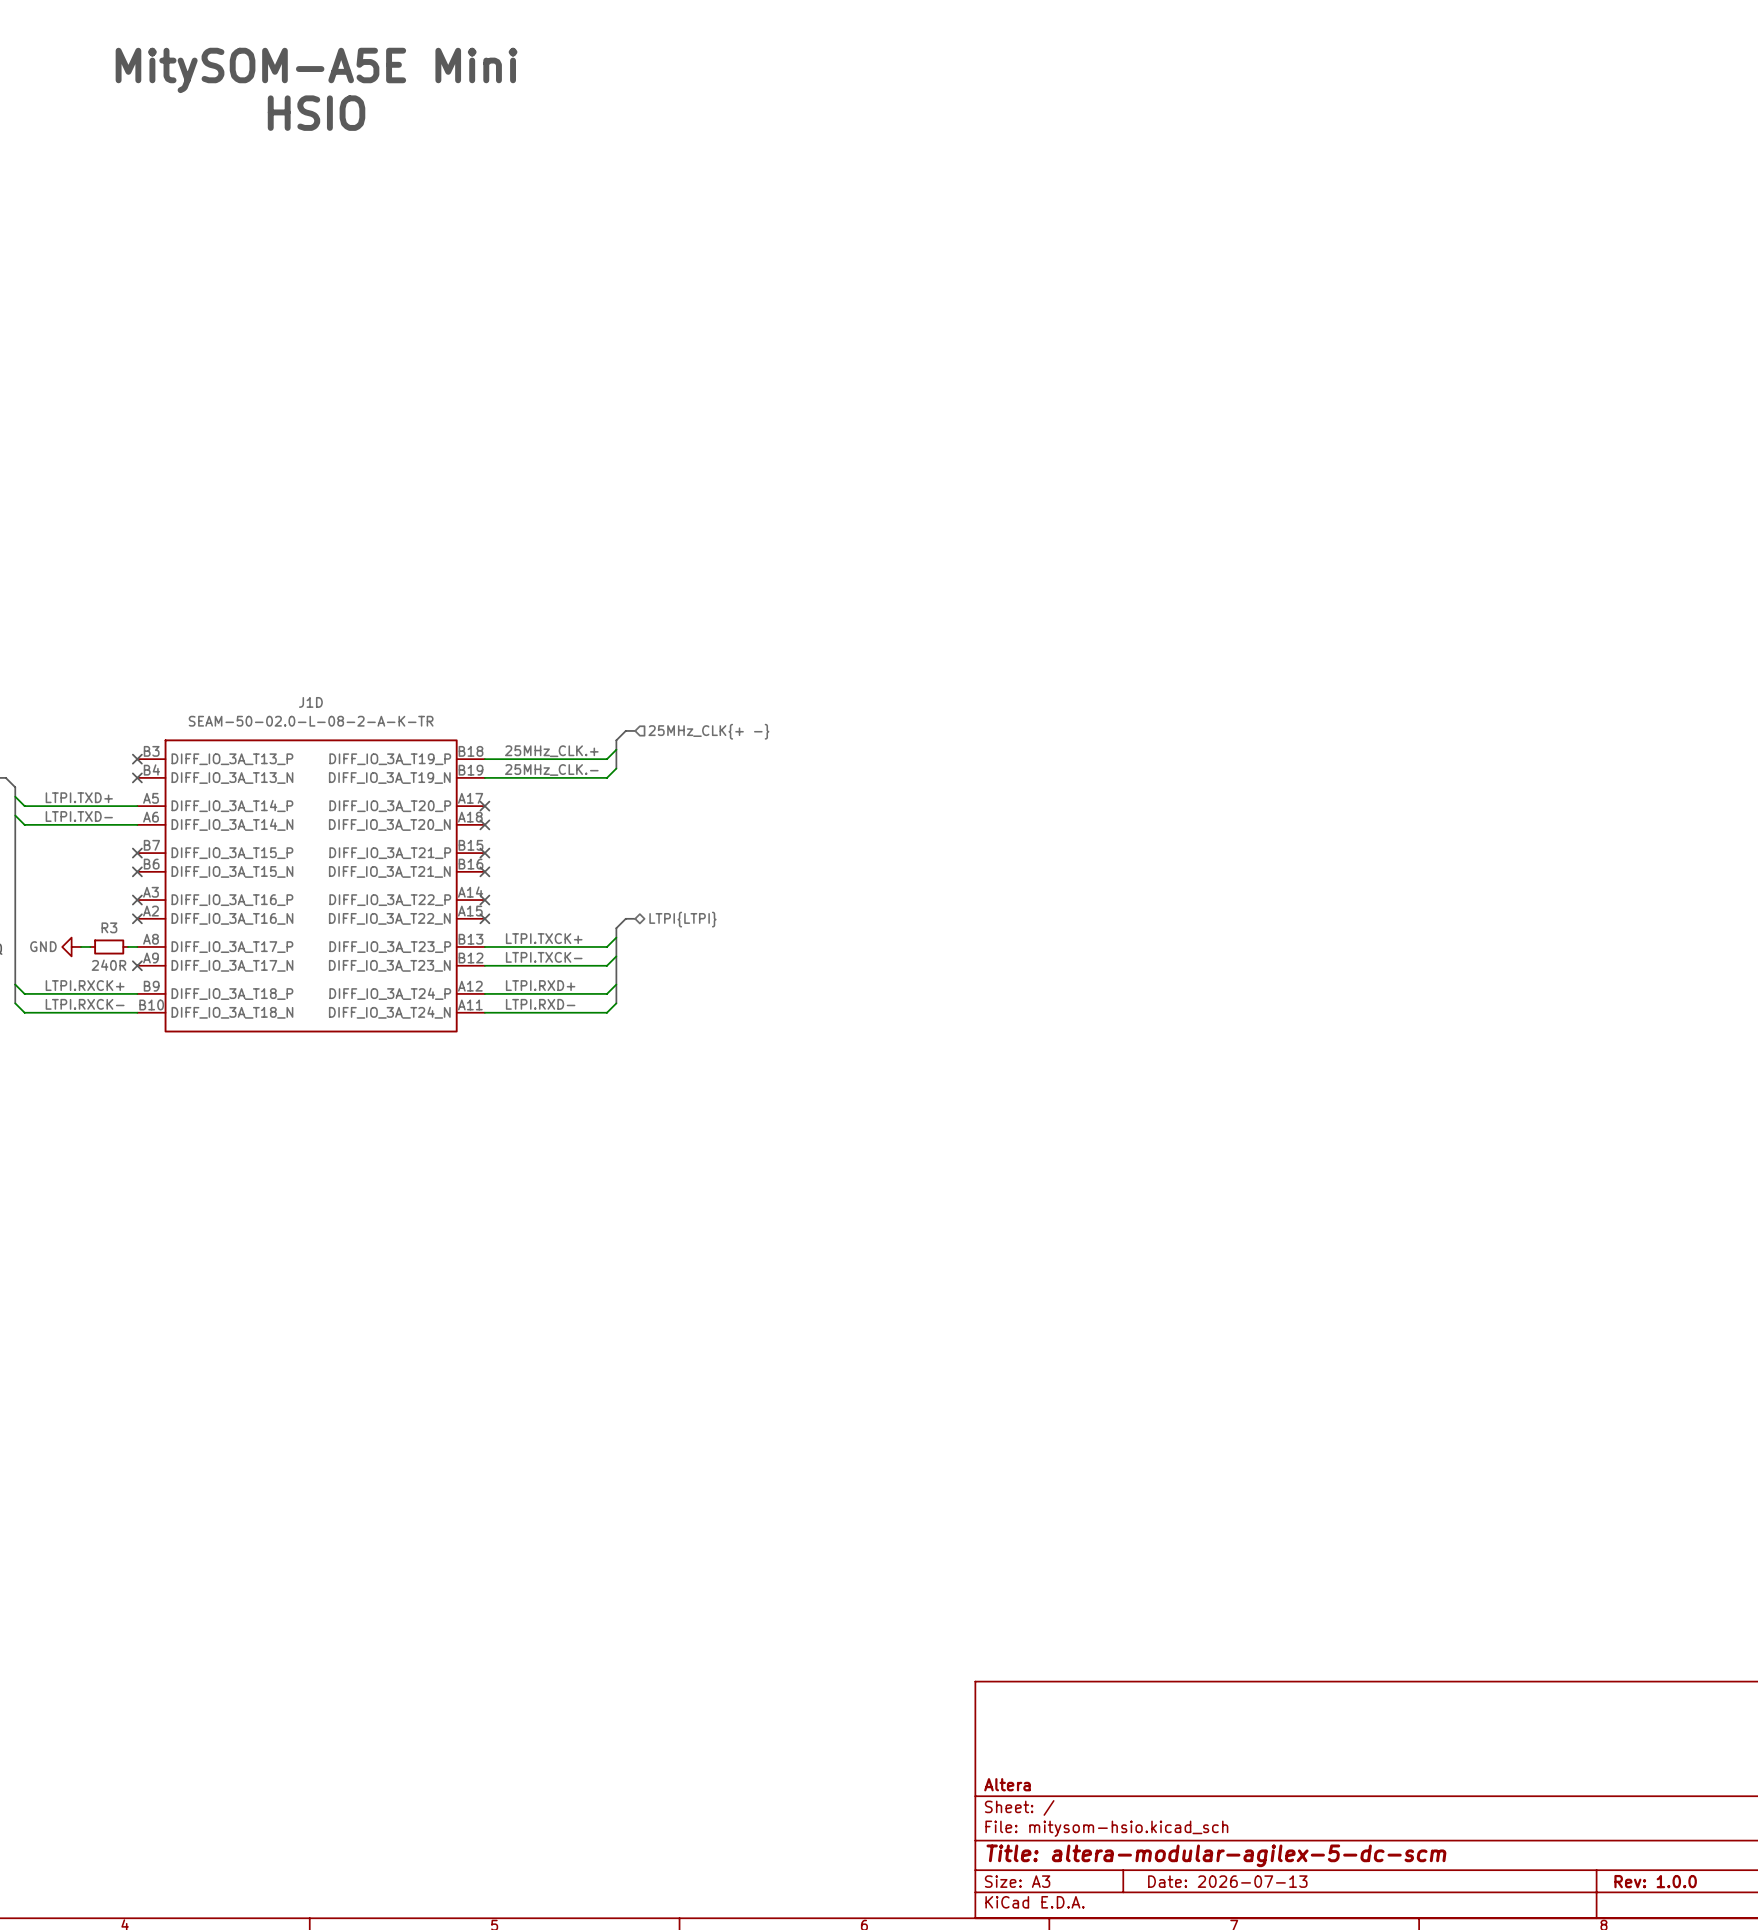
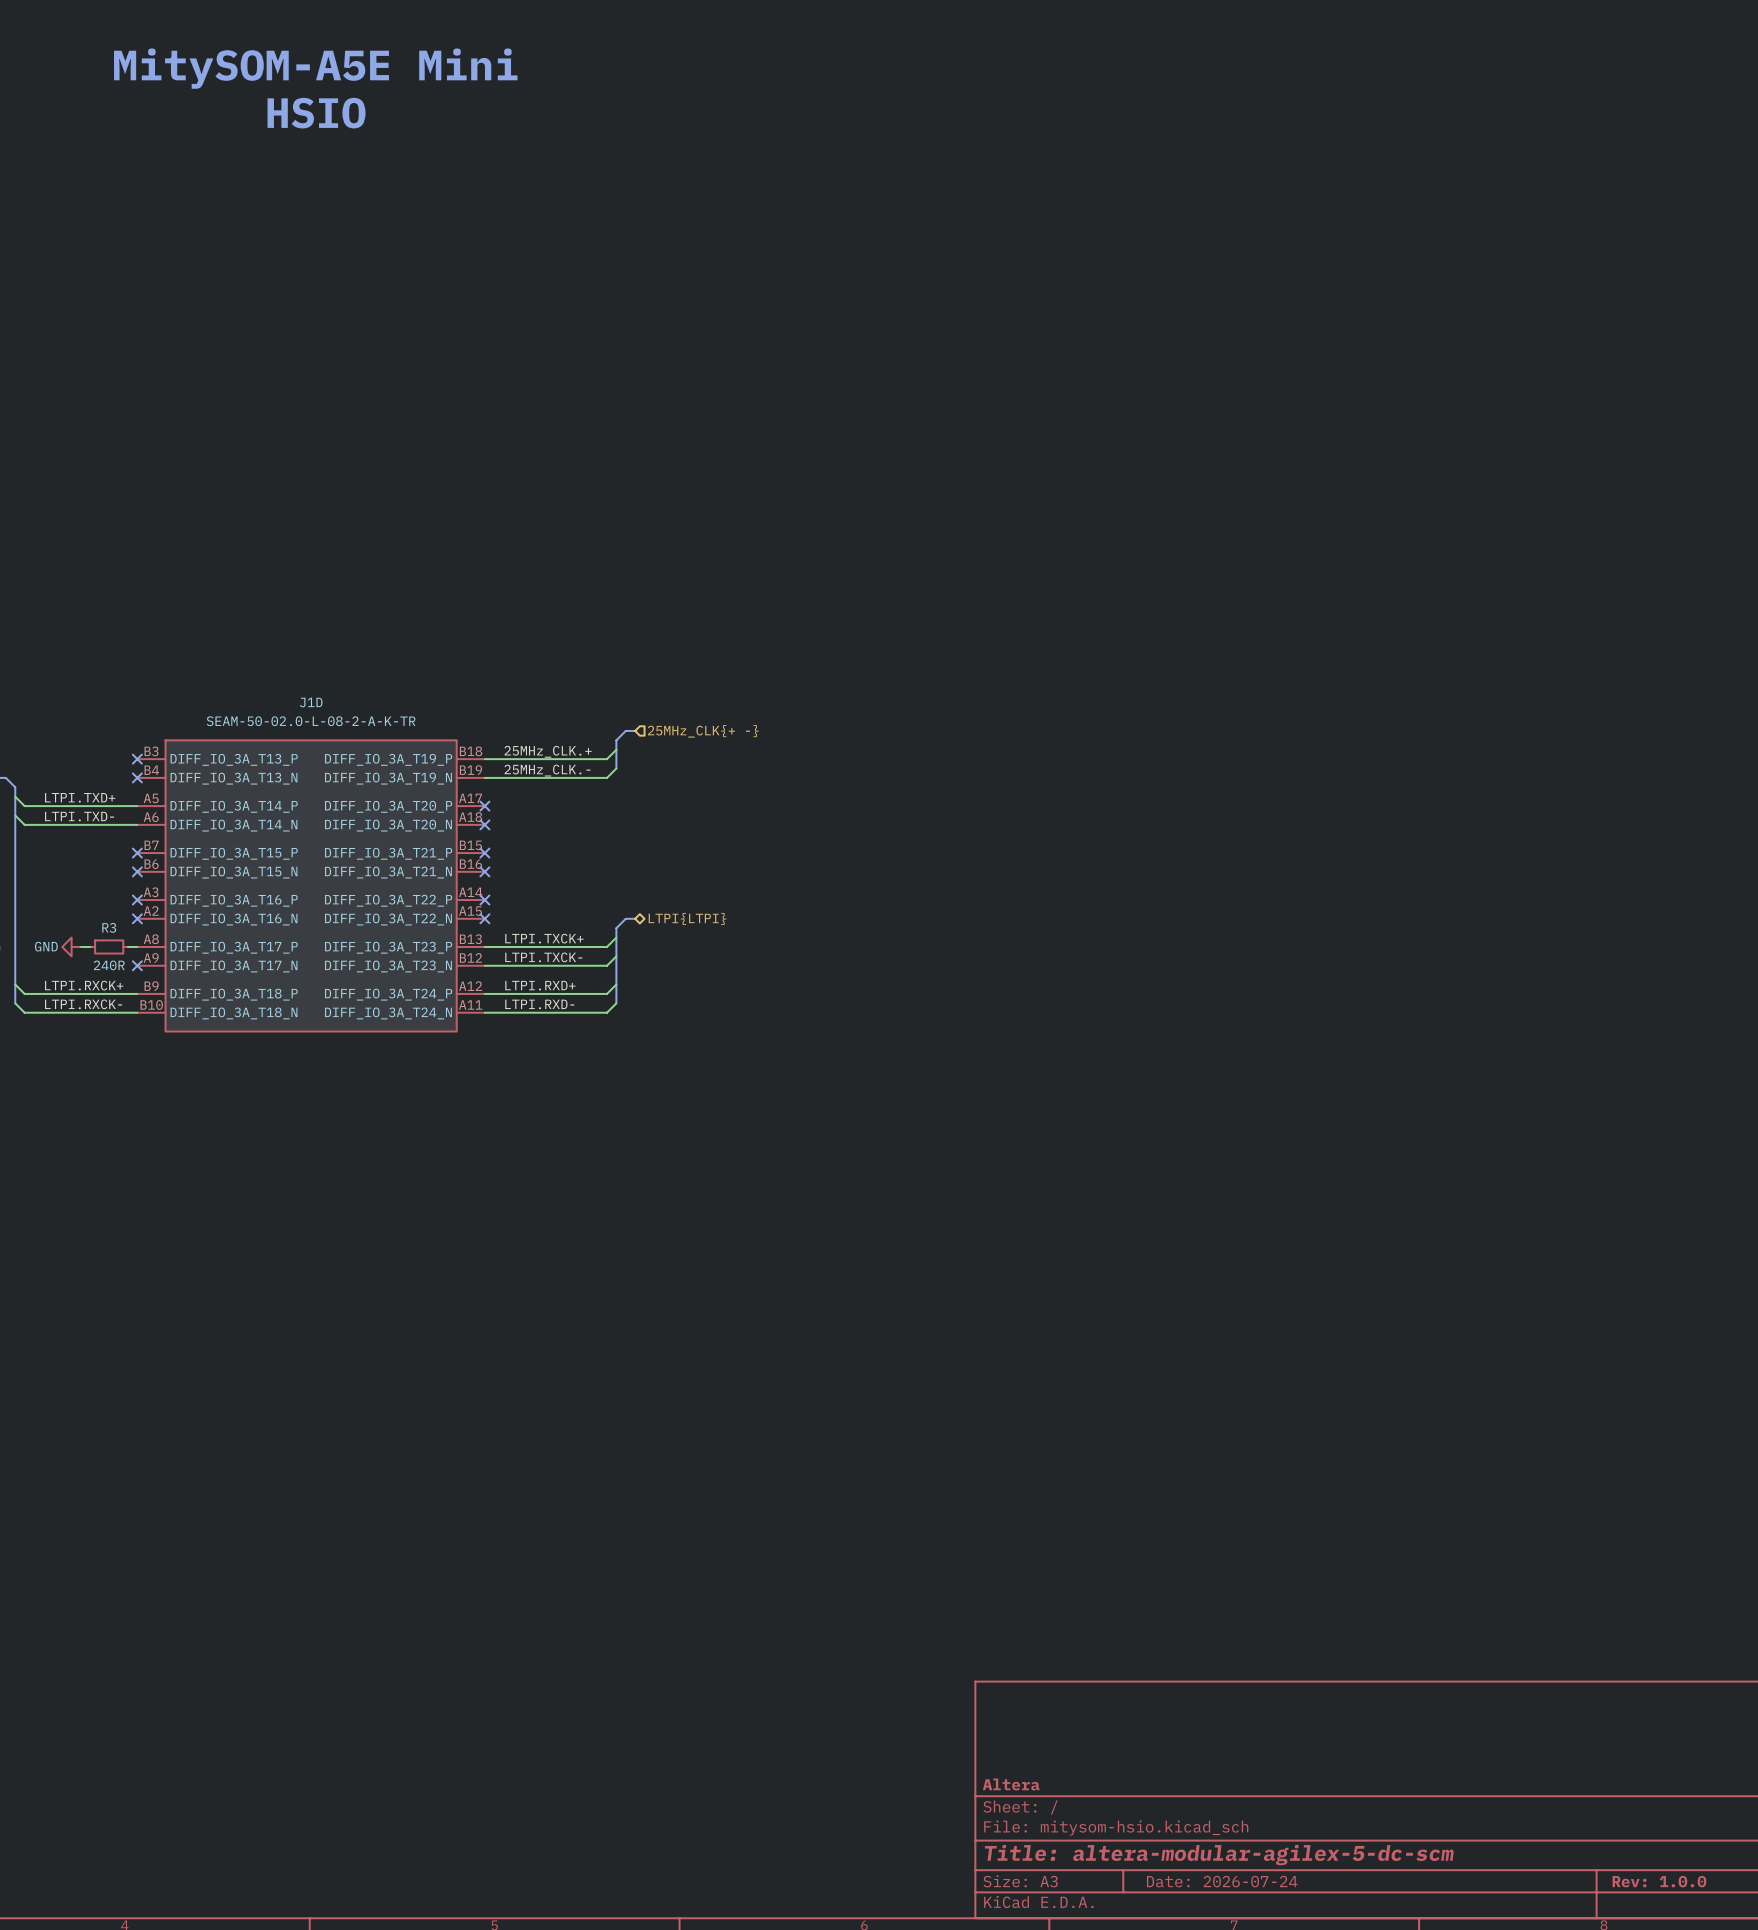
title block: Date: 2026-07-13 (1227, 1881) -> Date: 2026-07-24 (1222, 1881)

